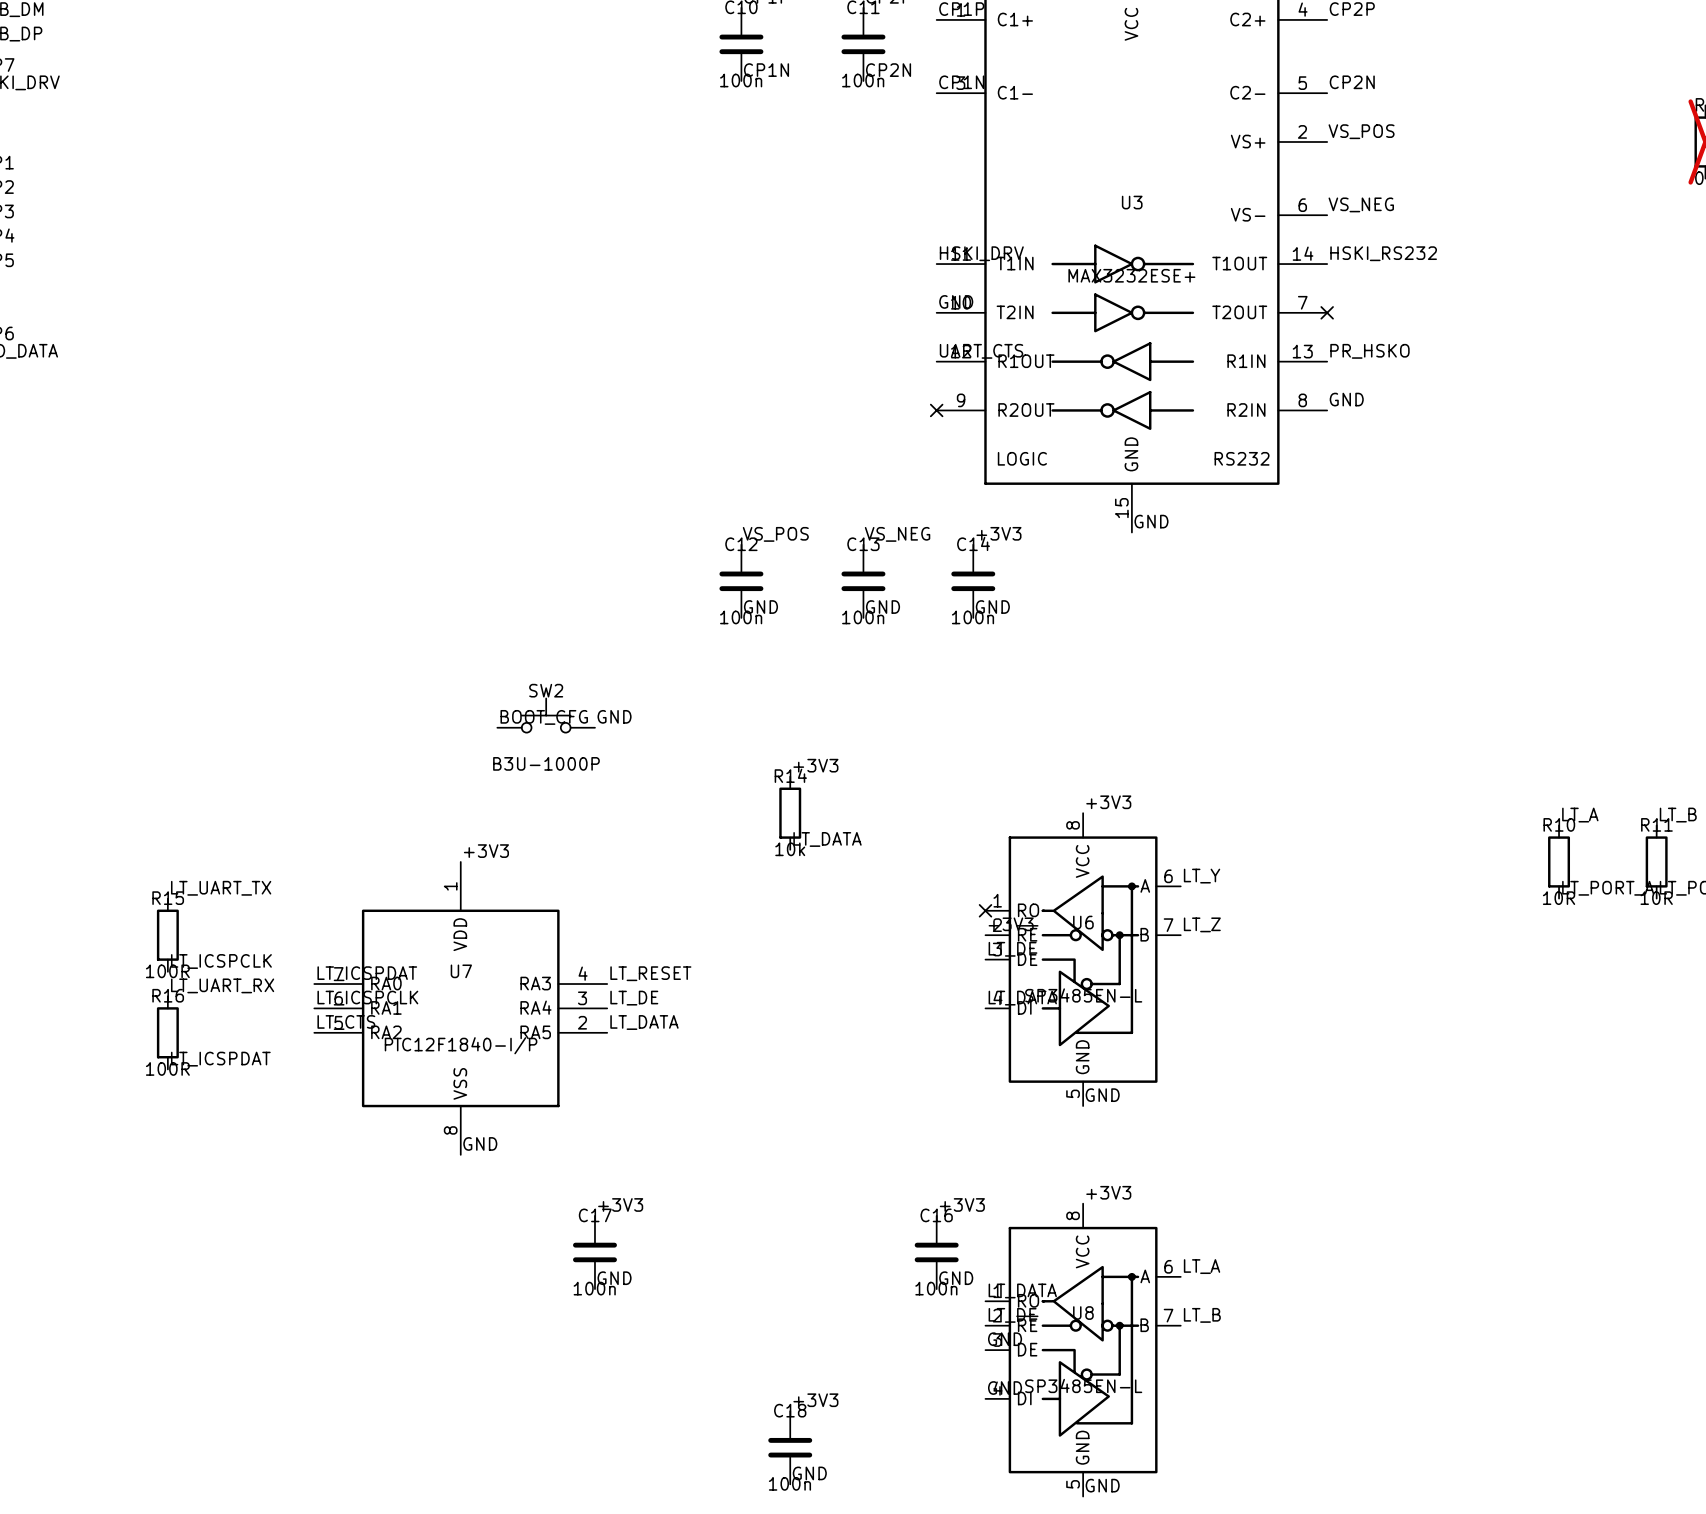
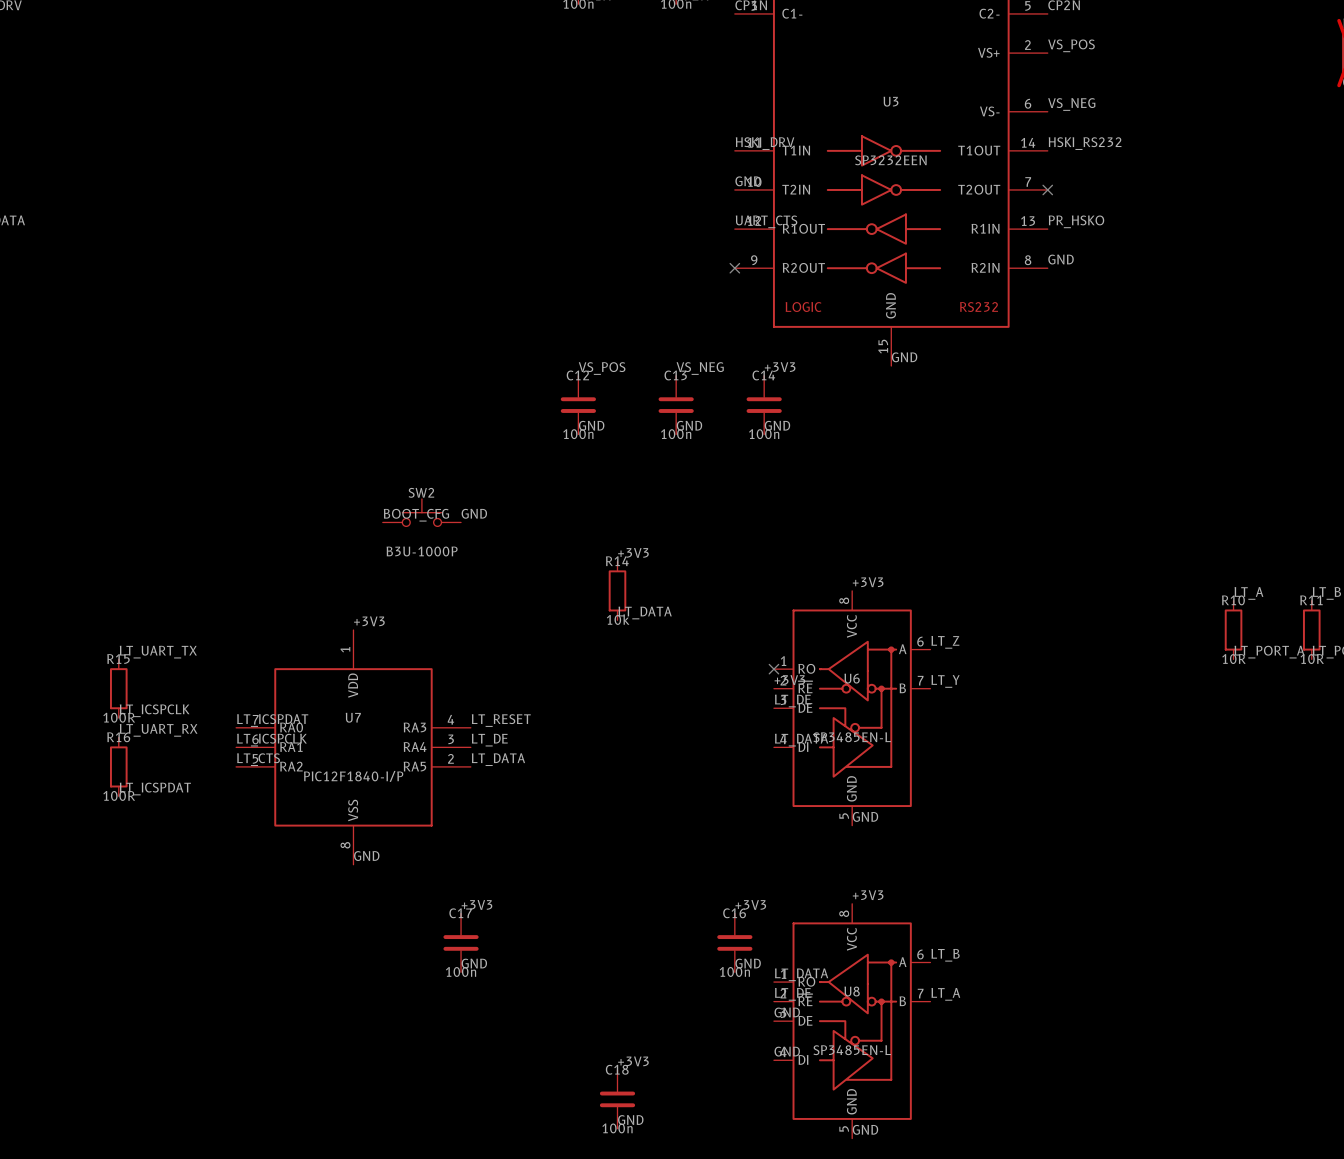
U3 value: MAX3232ESE+ (1131, 275) -> SP3232EEN (890, 160)
label: LT_Y (1202, 876) -> LT_Z (945, 642)
label: LT_Z (1202, 924) -> LT_Y (945, 681)
label: LT_A (1202, 1266) -> LT_B (945, 955)
label: LT_B (1202, 1315) -> LT_A (945, 994)

